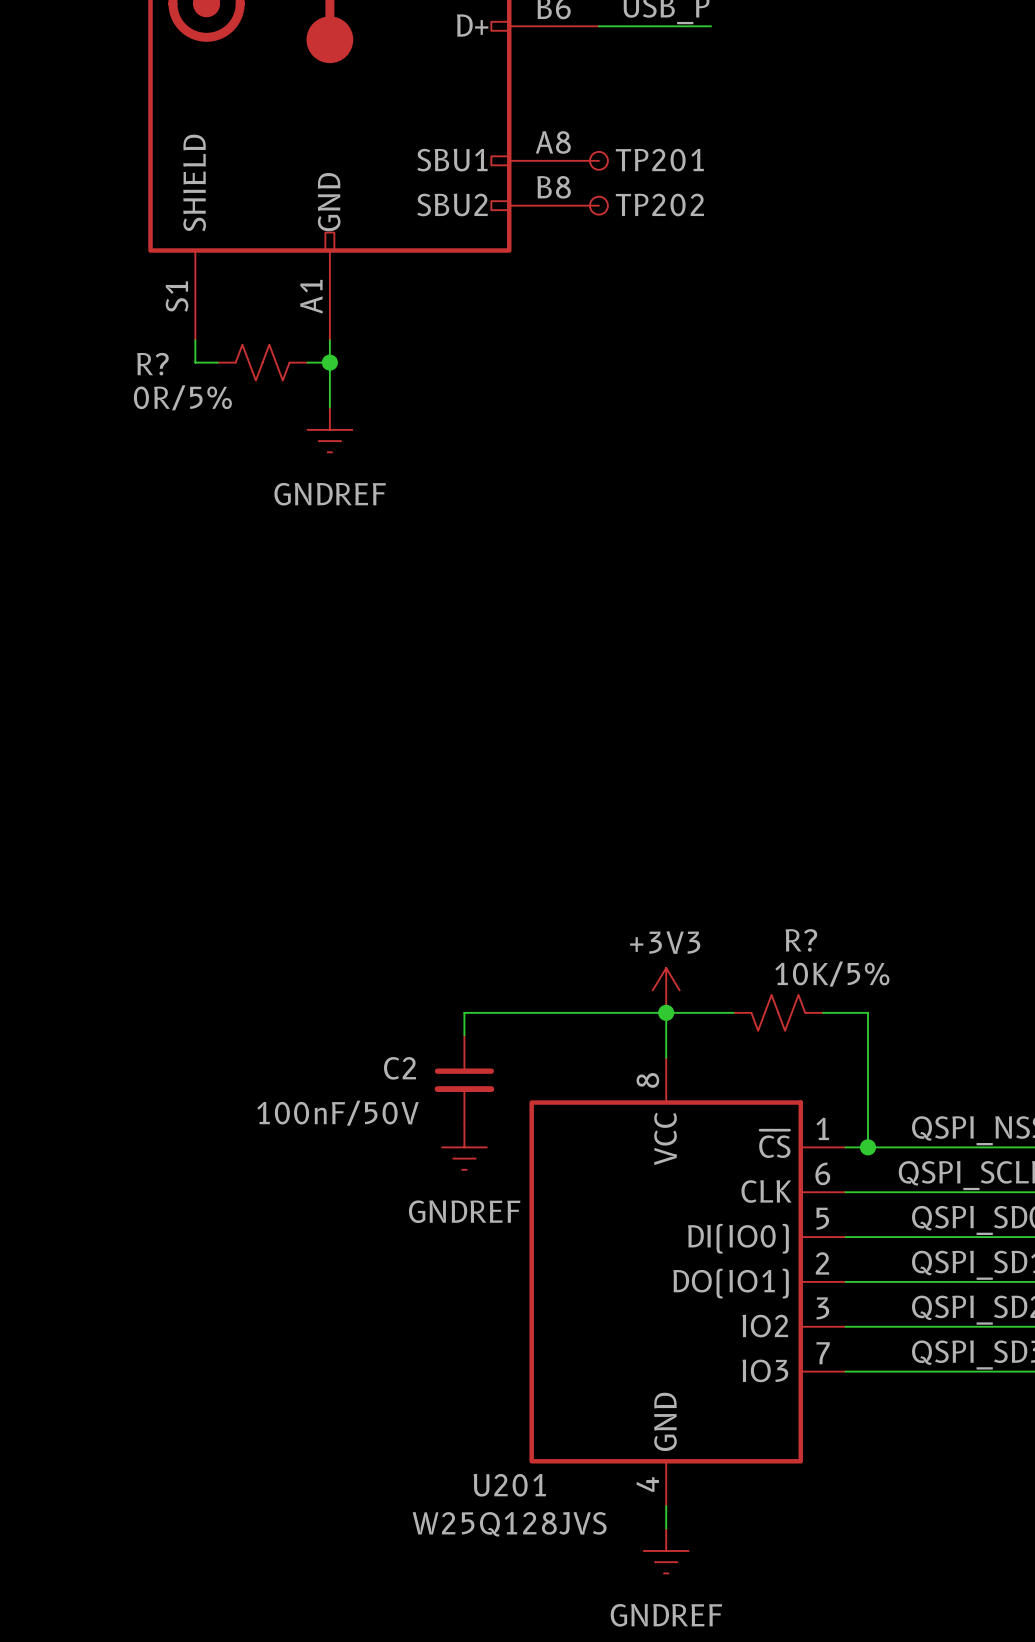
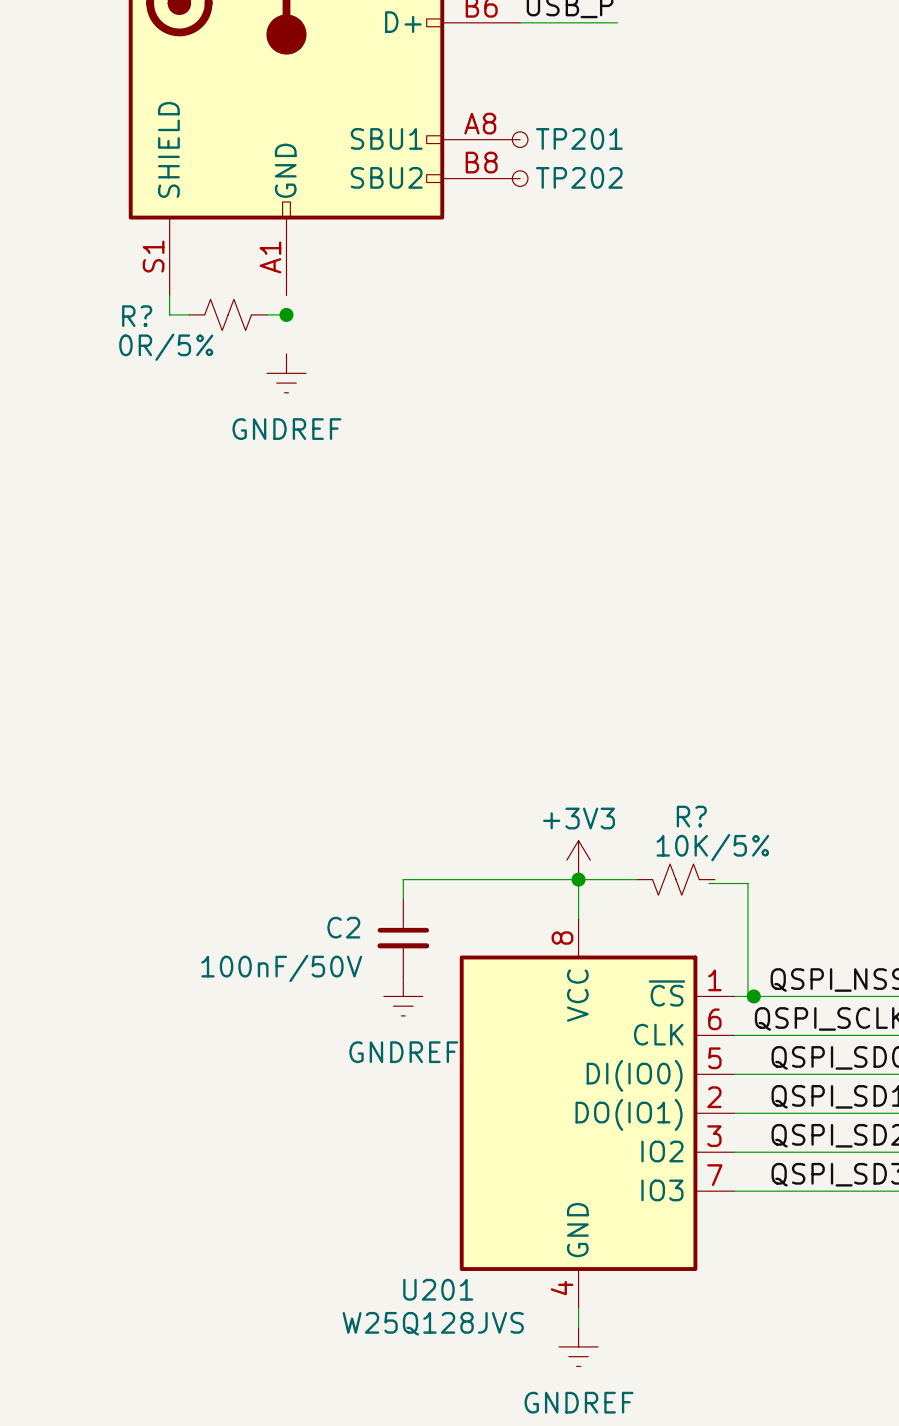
wire: (329, 340) (329, 407) -> none
wire: (823, 1012) (868, 1012) (868, 1147) -> none
wire: none -> (709, 883) (747, 883) (747, 996)

